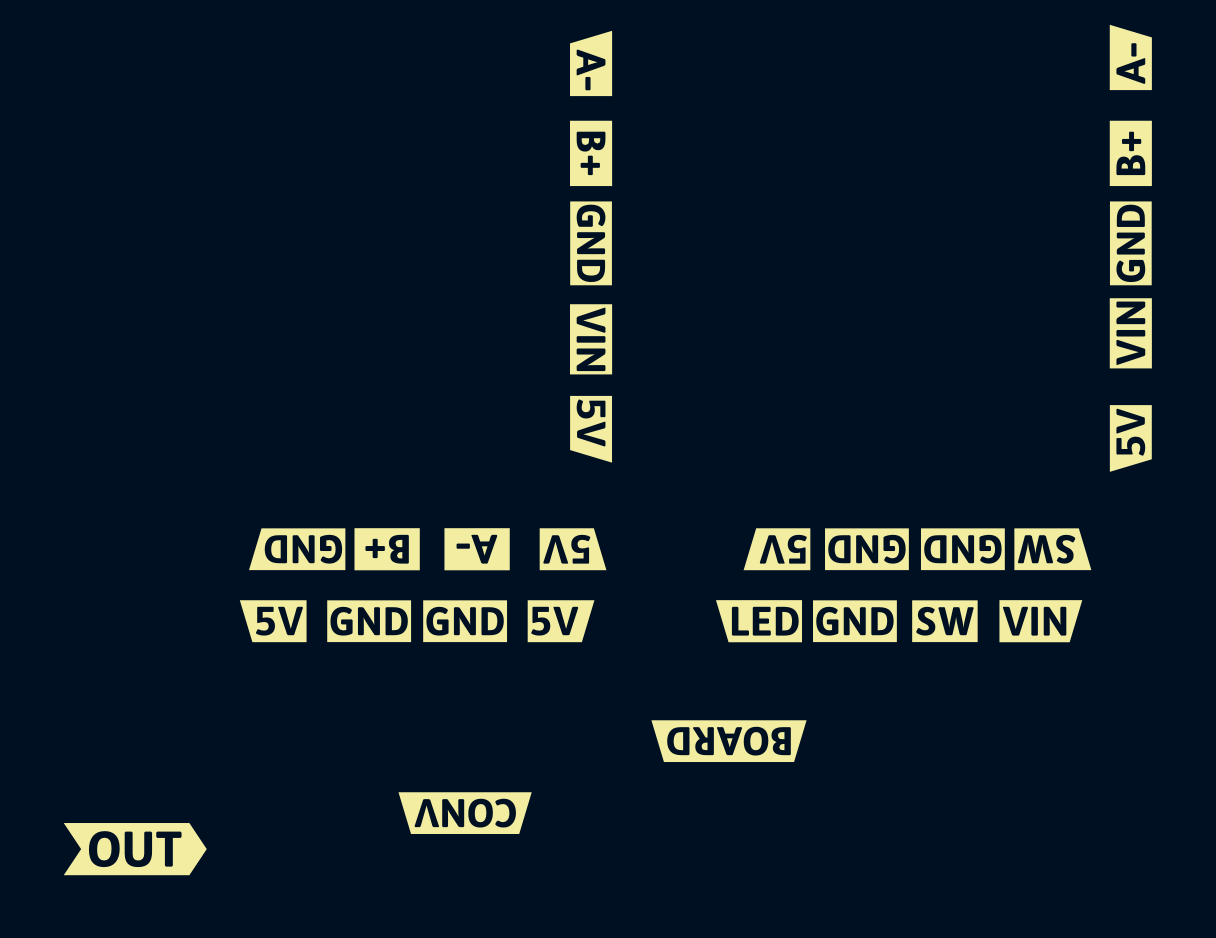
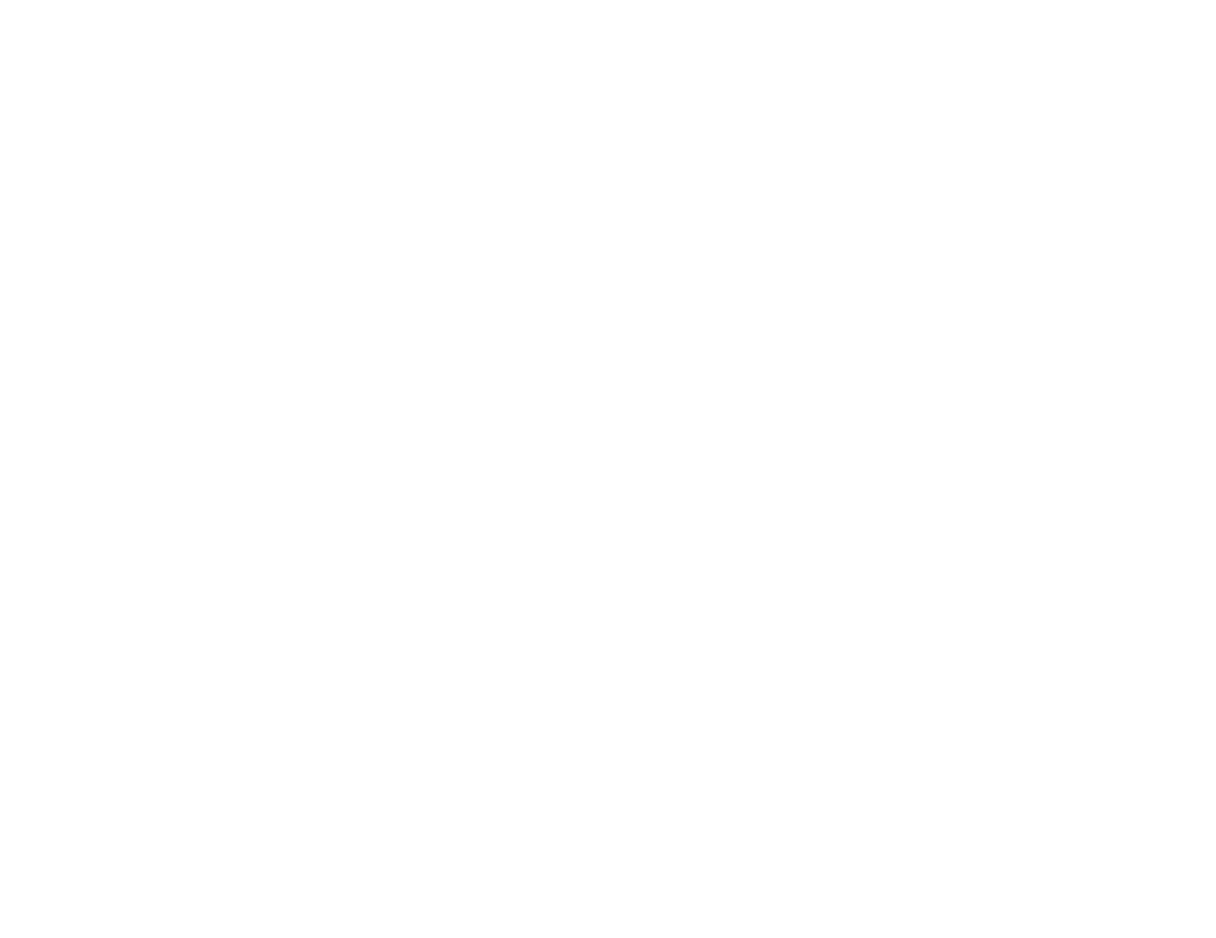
drawing: [1109, 24, 1152, 91] -> none
drawing: [569, 30, 613, 463] -> none
drawing: [1109, 120, 1152, 369] -> none
drawing: [1109, 405, 1152, 472] -> none
drawing: [248, 528, 510, 571] -> none
drawing: [539, 528, 607, 571] -> none
drawing: [743, 528, 1092, 571] -> none
drawing: [239, 600, 595, 643] -> none
drawing: [715, 600, 1083, 643] -> none
drawing: [651, 720, 807, 763] -> none
drawing: [398, 792, 532, 835] -> none
drawing: [63, 823, 207, 876] -> none

